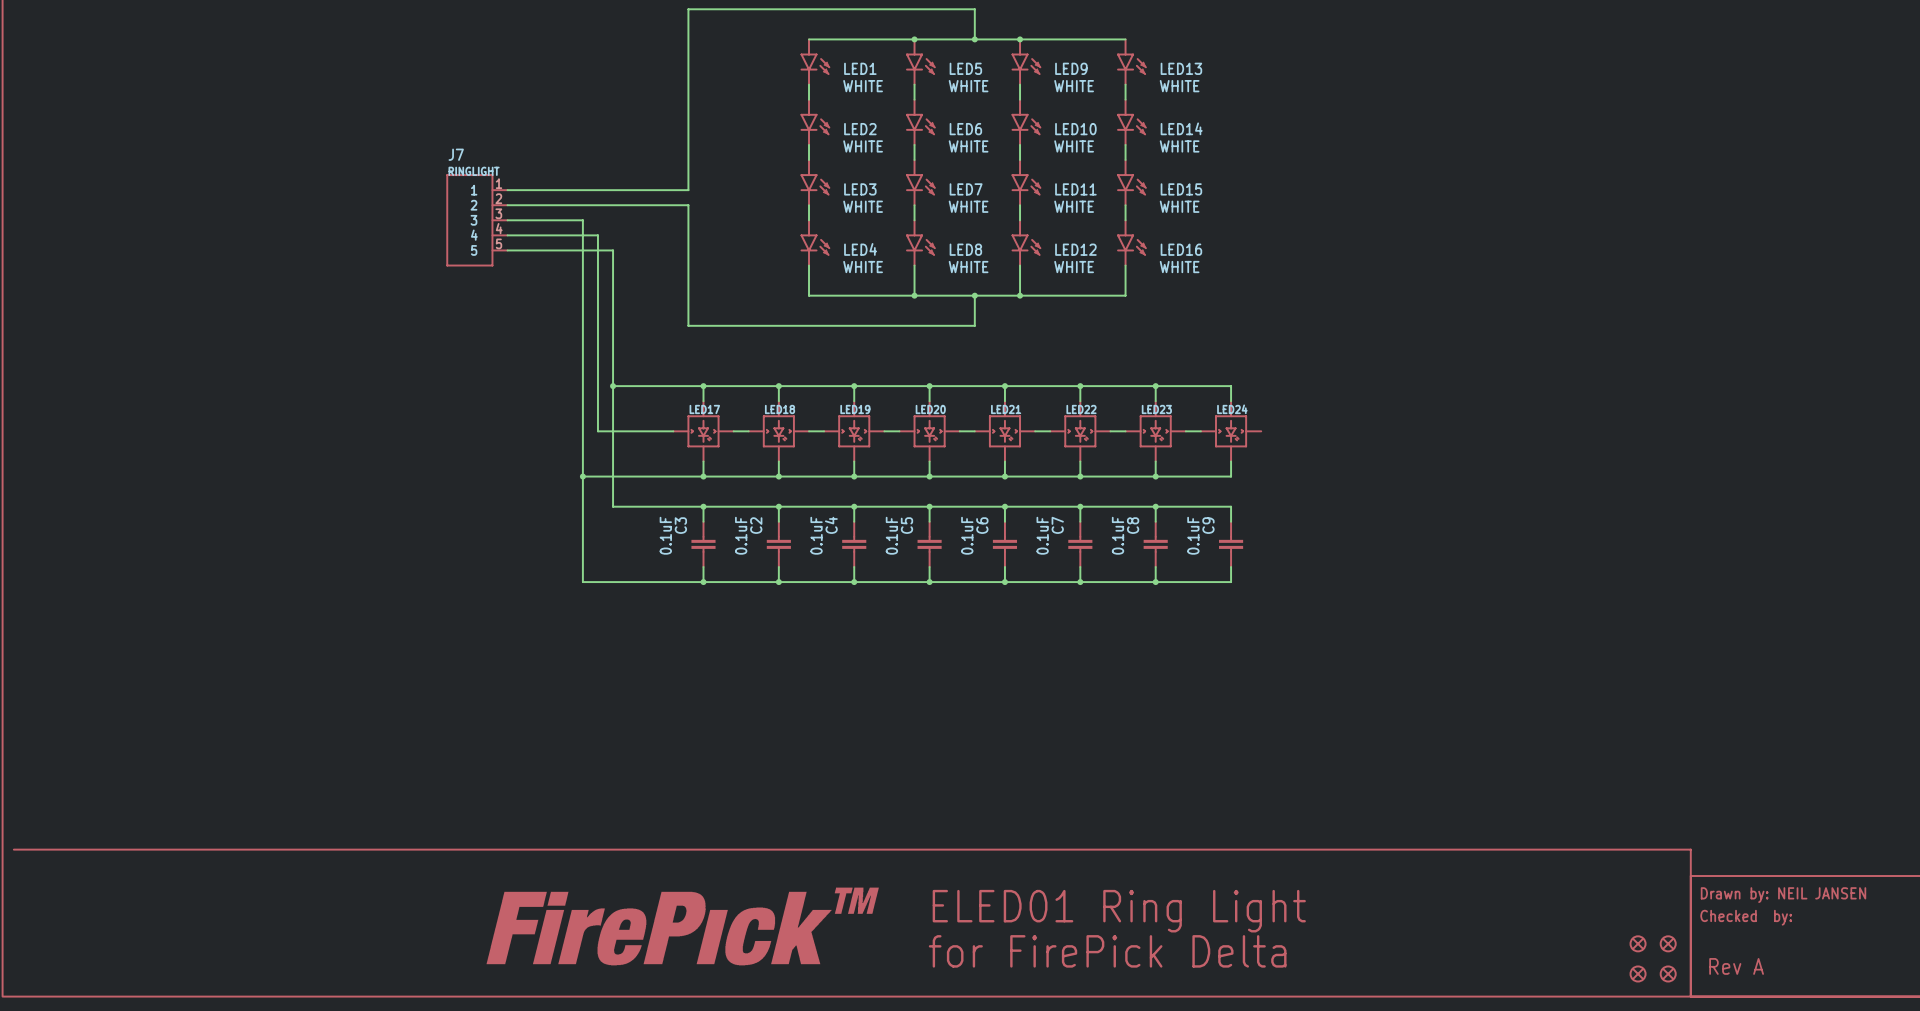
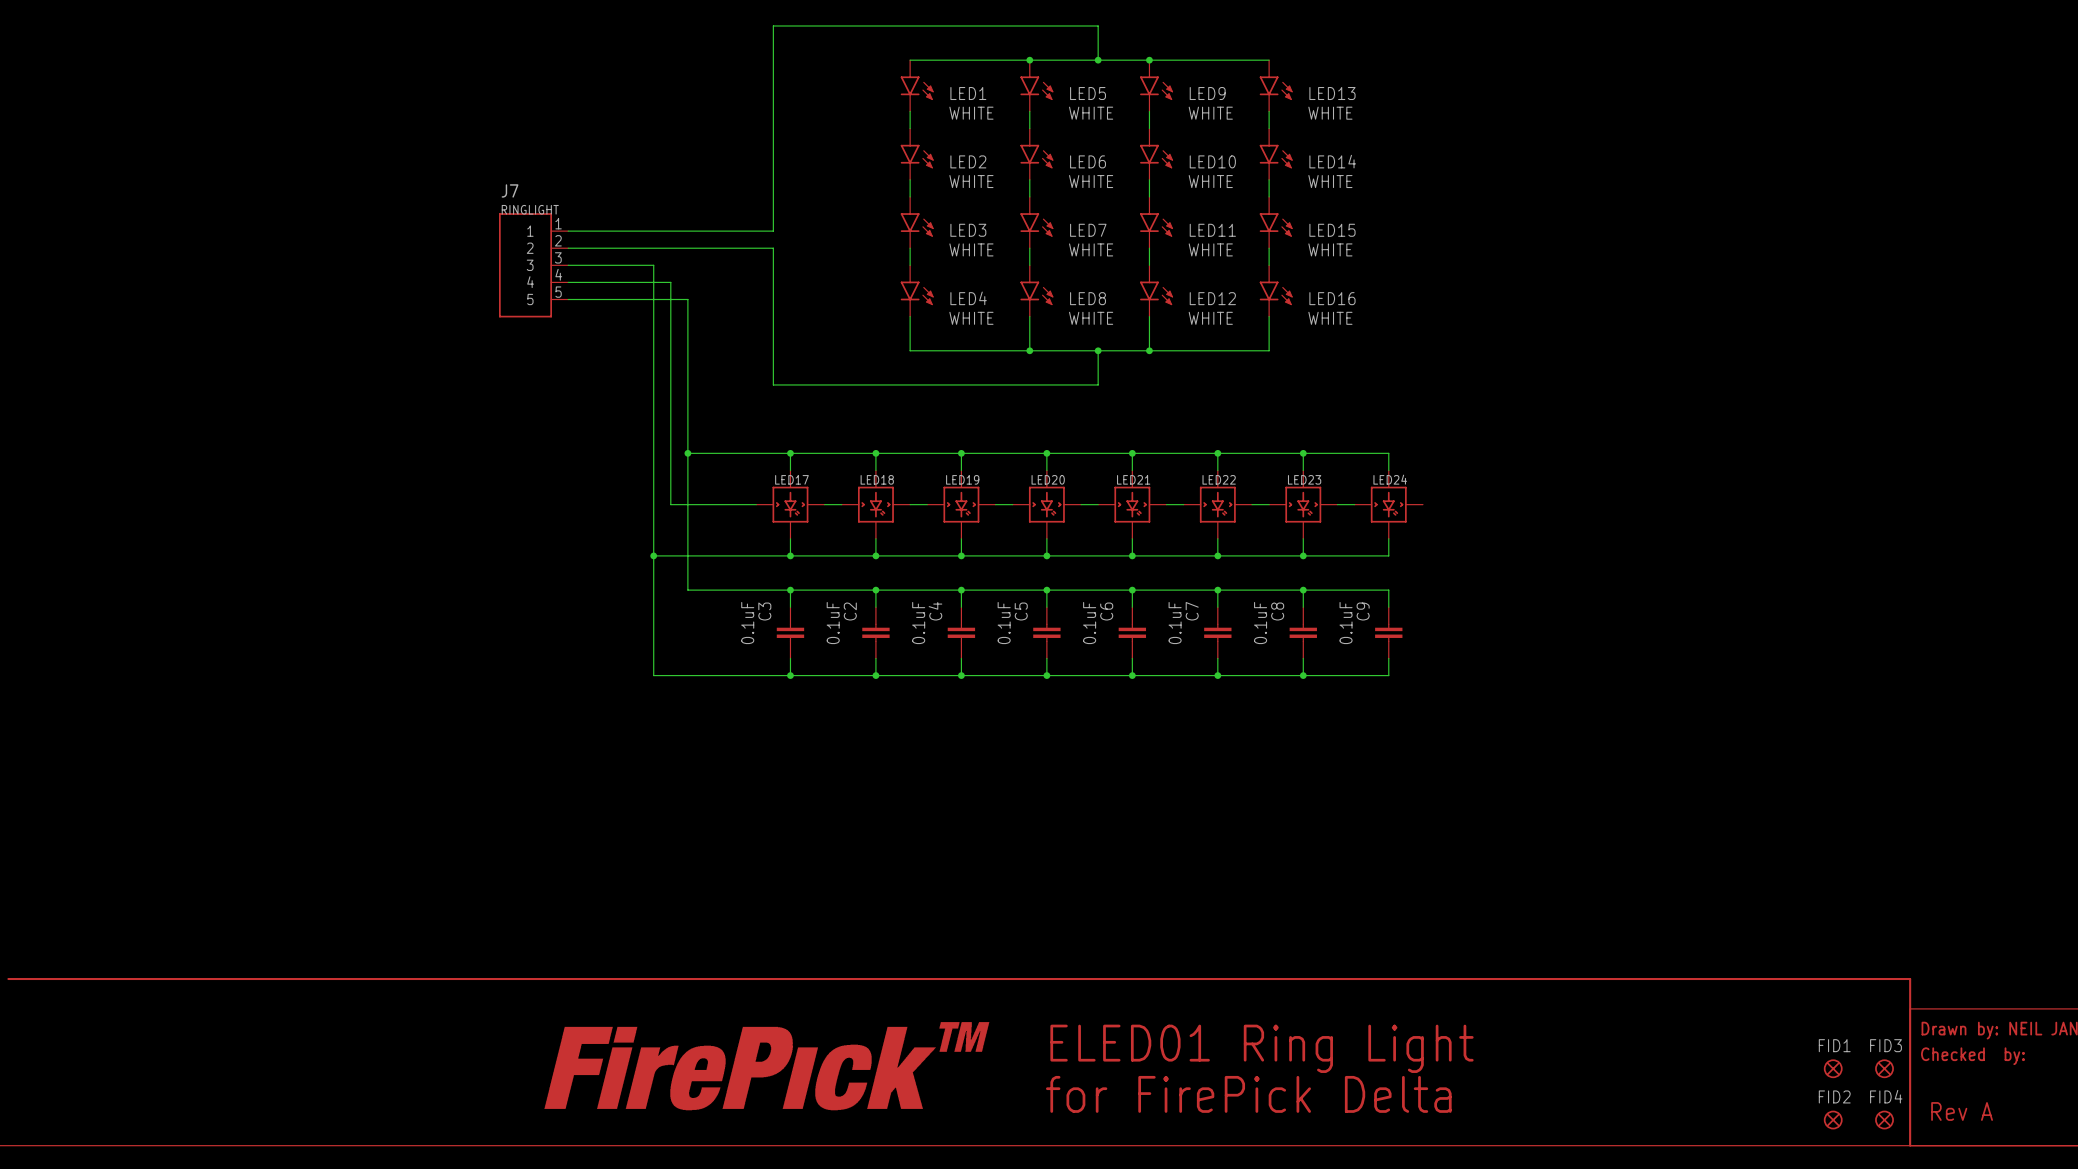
FID1: none -> (1833, 1068)
FID3: none -> (1884, 1068)
part: (1638, 943) -> none
part: (1668, 943) -> none
FID4 name: none -> FID4 (1886, 1096)
FID2: none -> (1833, 1120)
part: (1638, 973) -> none

